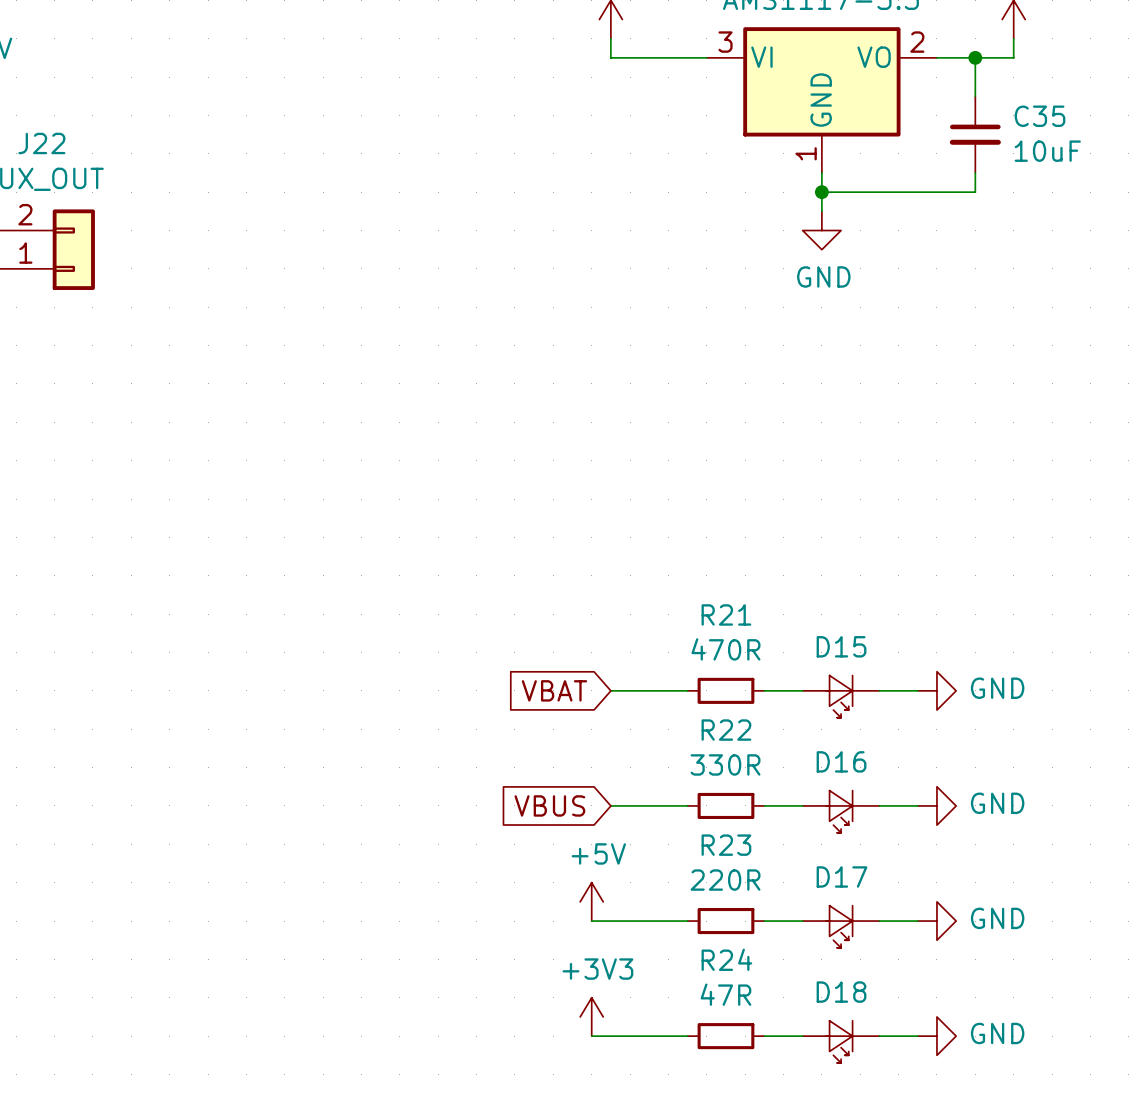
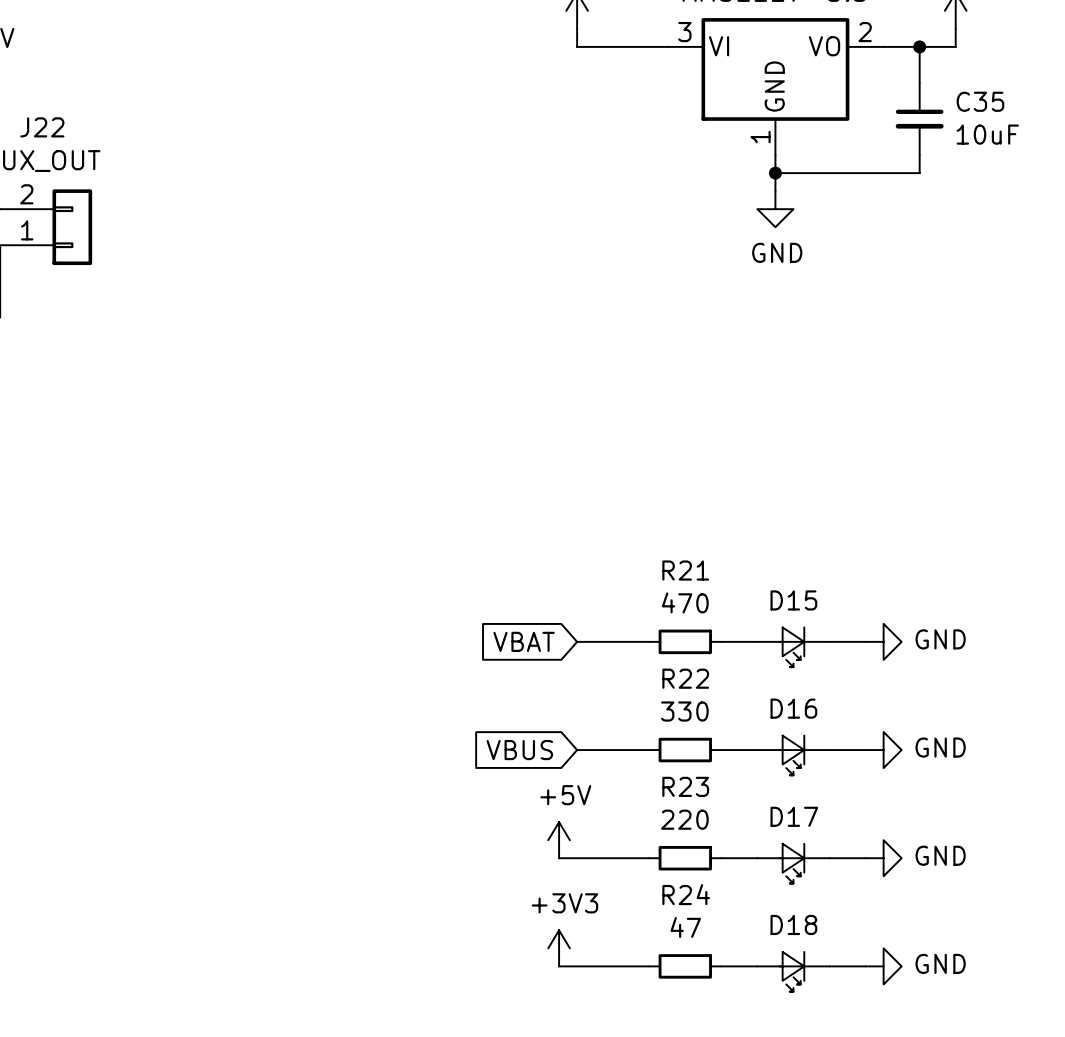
R21 value: 470R (725, 649) -> 470 (685, 602)
R22 value: 330R (725, 764) -> 330 (684, 711)
R23 value: 220R (725, 880) -> 220 (684, 819)
R24 value: 47R (725, 994) -> 47 (685, 927)

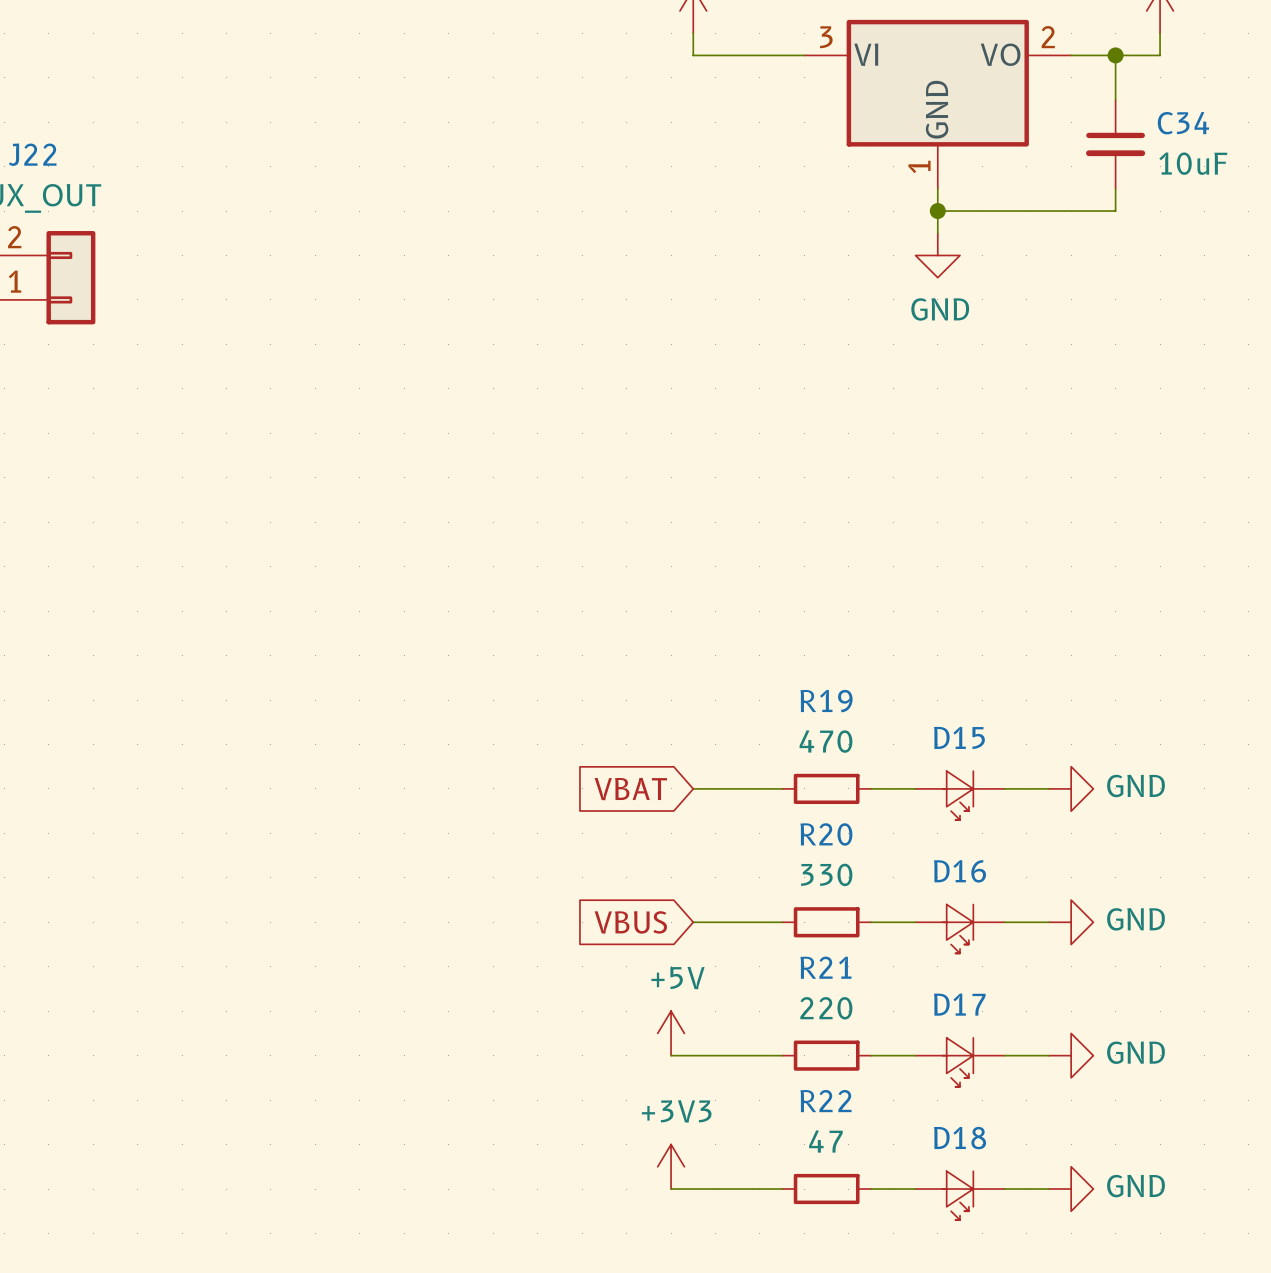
C35 name: C35 (980, 101) -> C34 (1183, 123)
R21 name: R21 (685, 570) -> R19 (826, 701)
R22 name: R22 (685, 678) -> R20 (826, 834)
R23 name: R23 (685, 786) -> R21 (825, 967)
R24 name: R24 (686, 894) -> R22 (825, 1101)

